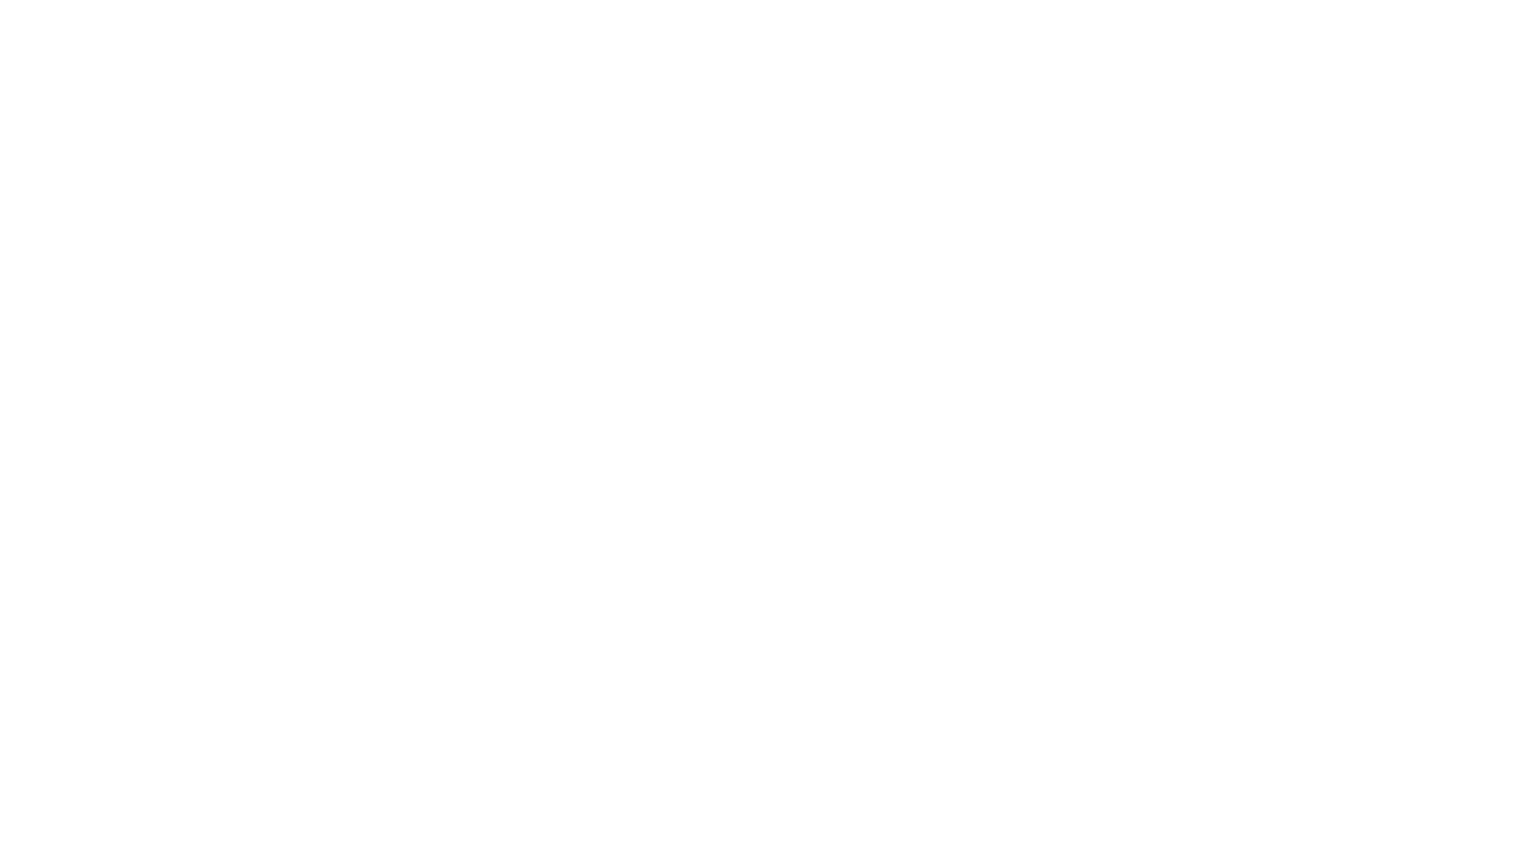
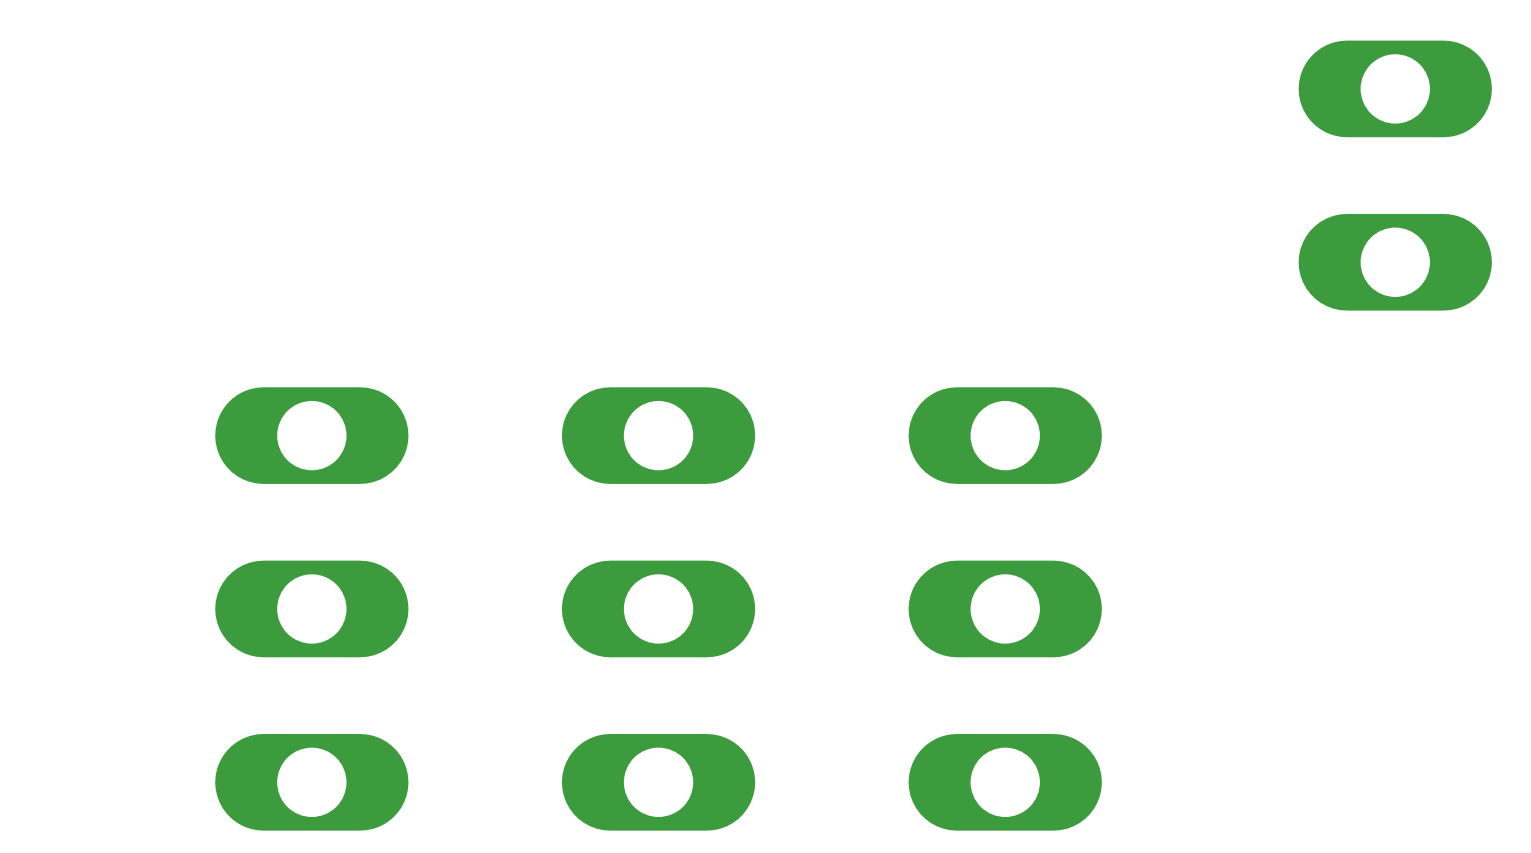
part: none -> (1395, 175)
part: none -> (311, 608)
part: none -> (658, 608)
part: none -> (1005, 608)

